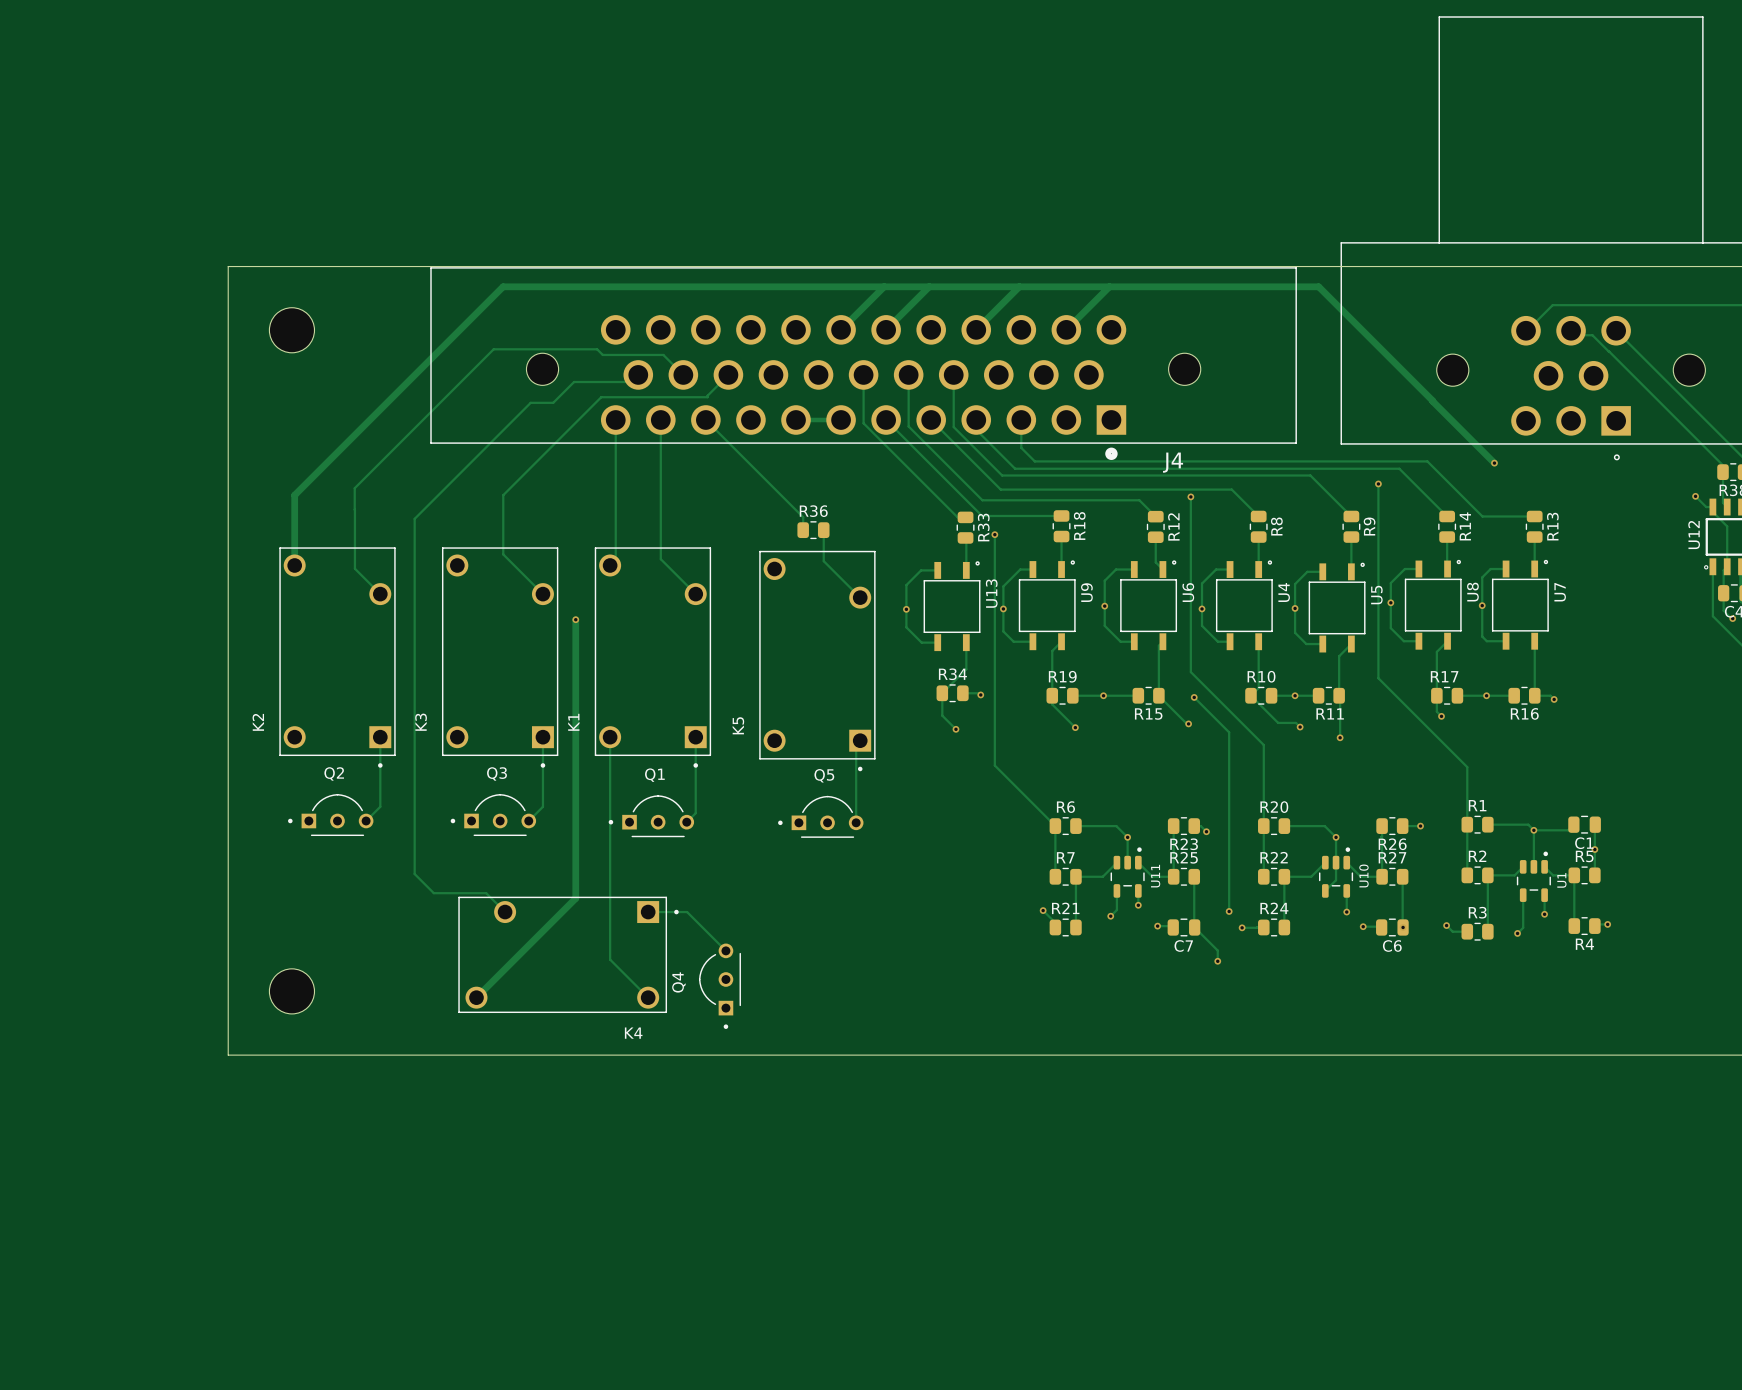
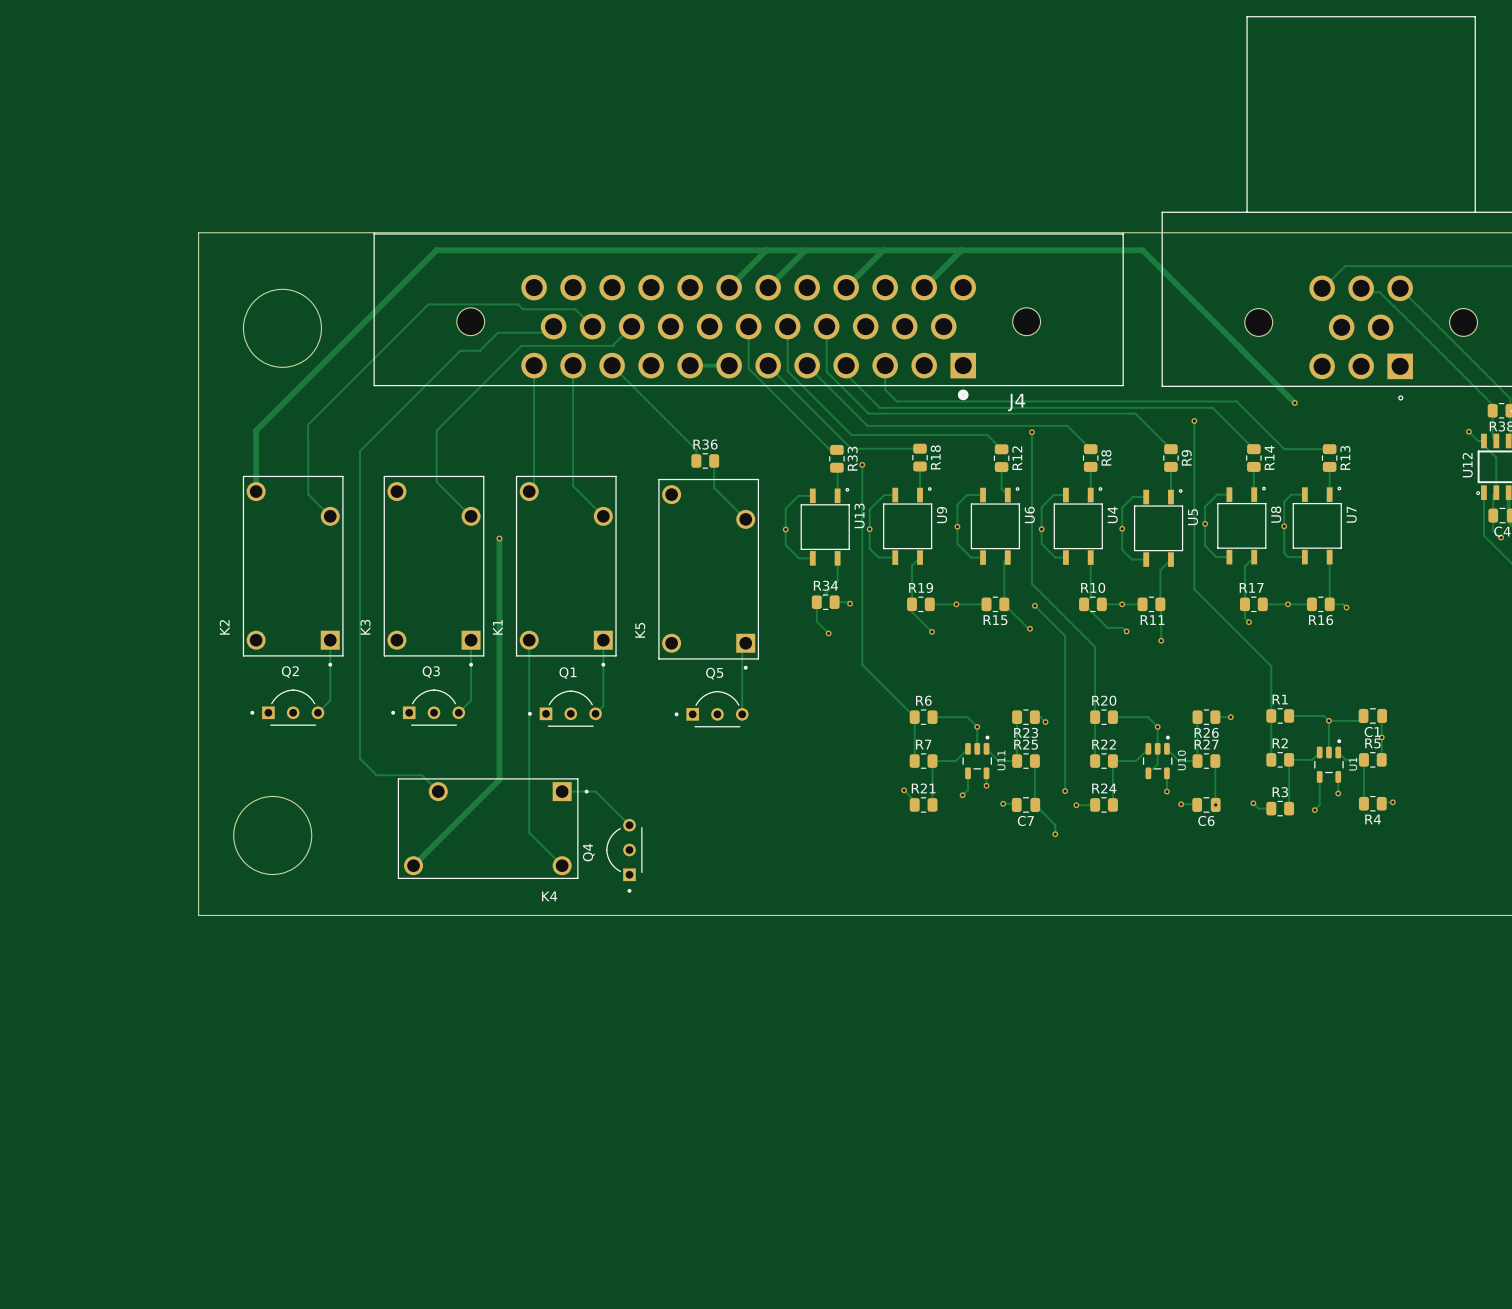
part: (291, 330) -> none
round board edge: none -> [243, 289, 322, 368]
round board edge: none -> [233, 796, 312, 875]
part: (291, 991) -> none

